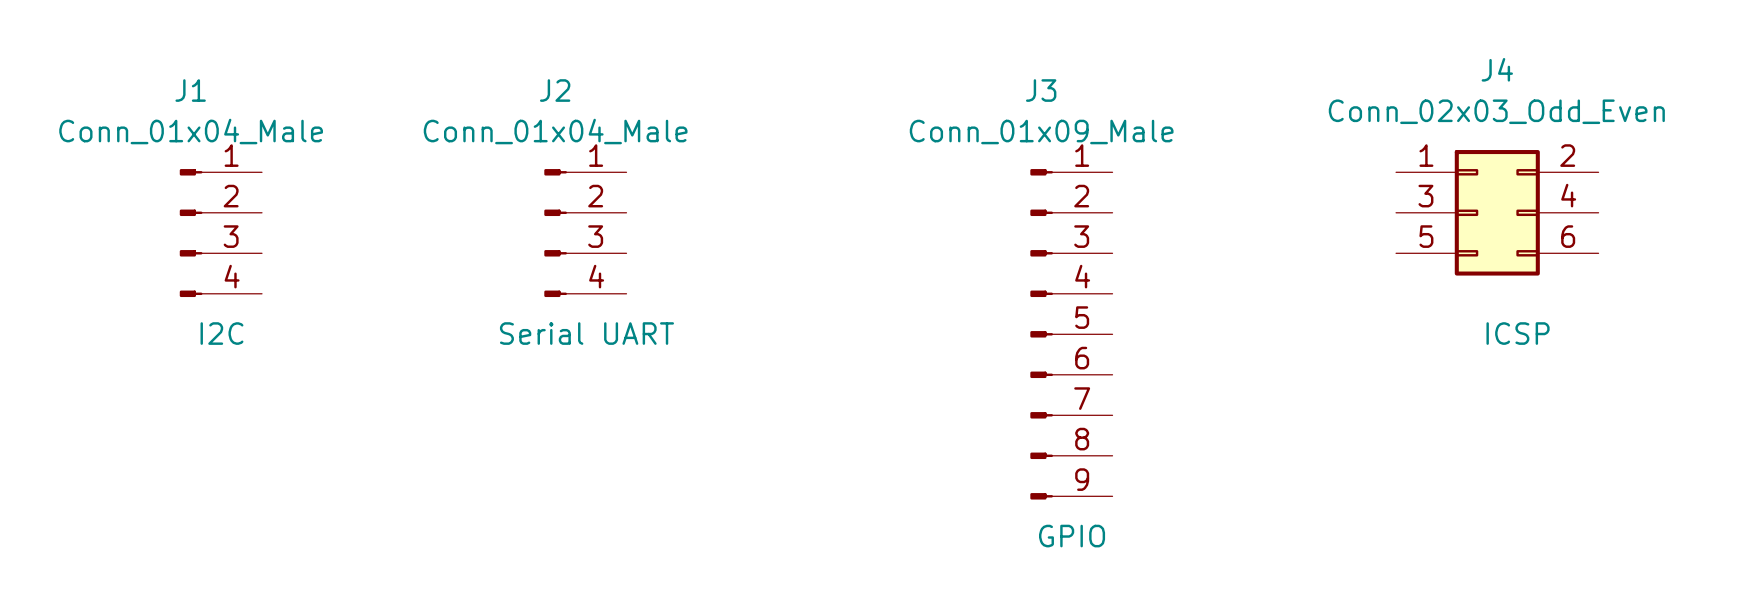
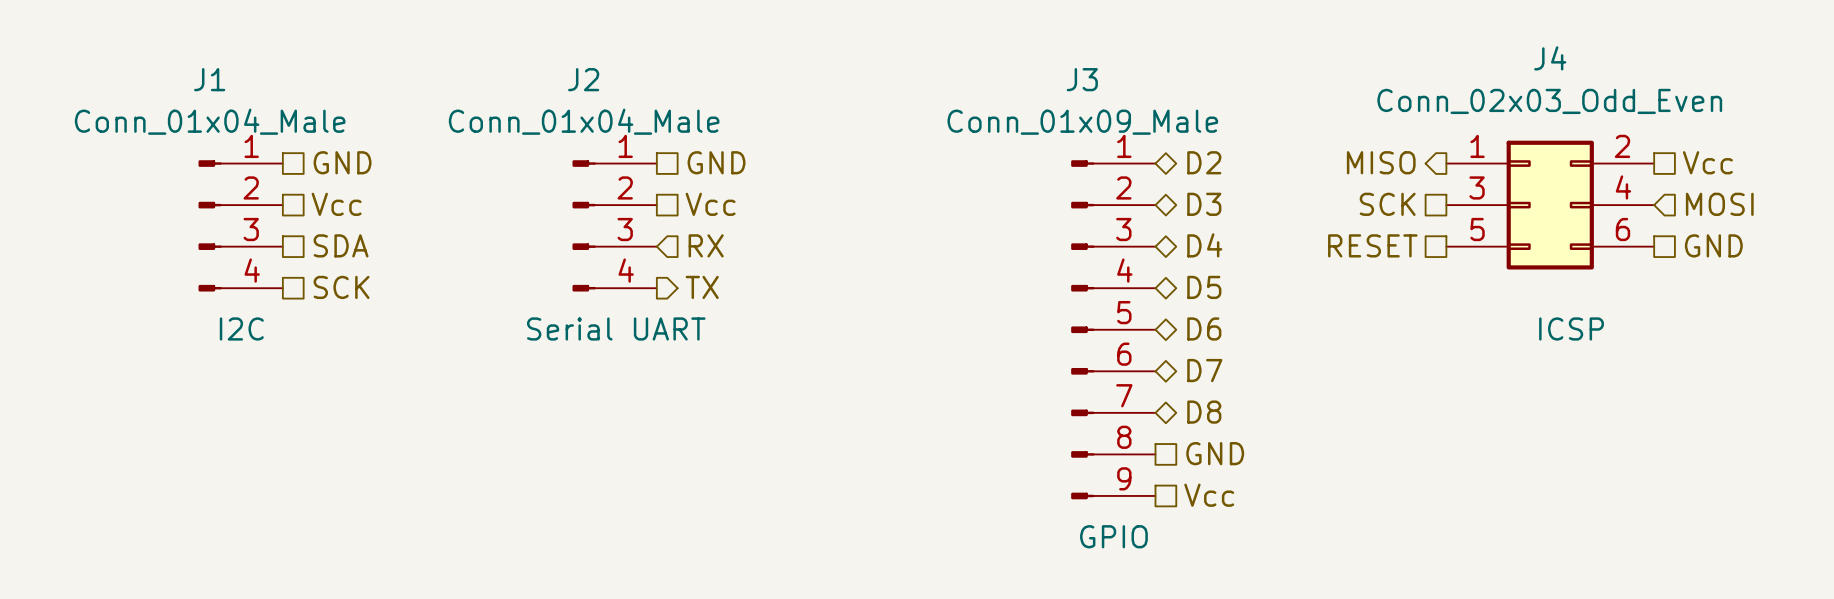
hierarchical label: none -> GND (342, 162)
hierarchical label: none -> GND (716, 162)
hierarchical label: none -> D2 (1204, 162)
hierarchical label: none -> MISO (1381, 162)
hierarchical label: none -> Vcc (1707, 162)
hierarchical label: none -> Vcc (336, 204)
hierarchical label: none -> Vcc (710, 204)
hierarchical label: none -> D3 (1204, 204)
hierarchical label: none -> SCK (1387, 204)
hierarchical label: none -> MOSI (1719, 204)
hierarchical label: none -> SDA (341, 245)
hierarchical label: none -> RX (706, 245)
hierarchical label: none -> D4 (1204, 245)
hierarchical label: none -> RESET (1372, 245)
hierarchical label: none -> GND (1713, 245)
hierarchical label: none -> SCK (341, 287)
hierarchical label: none -> TX (702, 287)
hierarchical label: none -> D5 (1204, 287)
hierarchical label: none -> D6 (1204, 328)
hierarchical label: none -> D7 (1204, 370)
hierarchical label: none -> D8 (1204, 412)
hierarchical label: none -> GND (1215, 453)
hierarchical label: none -> Vcc (1209, 495)

